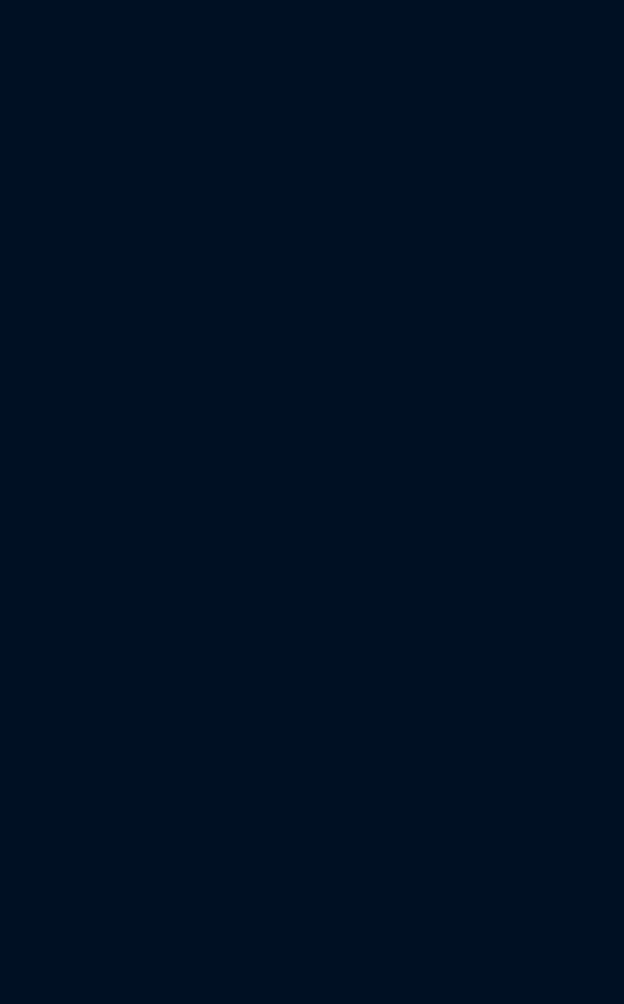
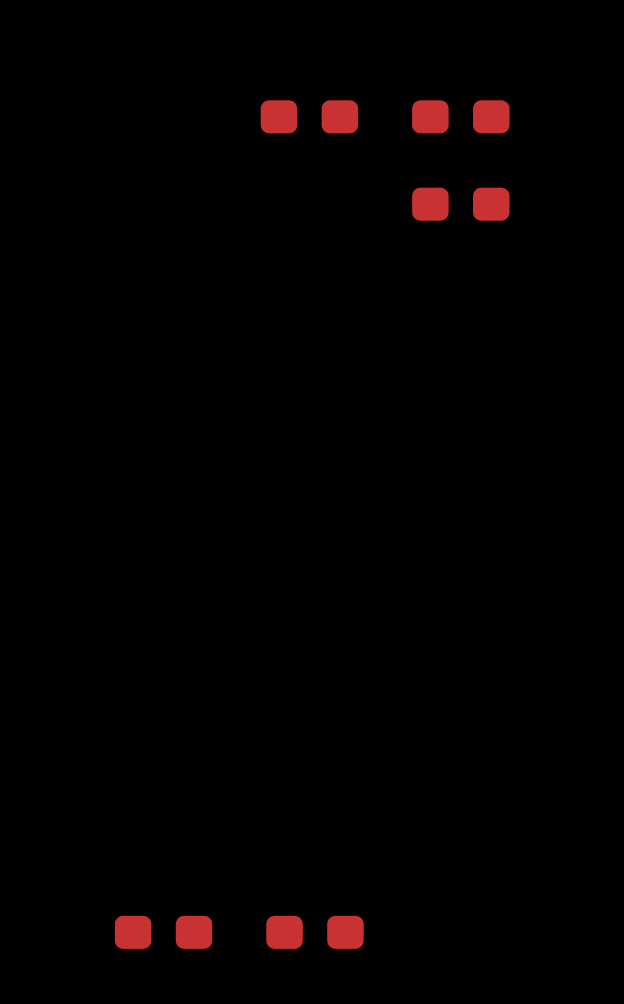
part: none -> (309, 116)
part: none -> (460, 116)
part: none -> (460, 204)
part: none -> (163, 932)
part: none -> (314, 932)

